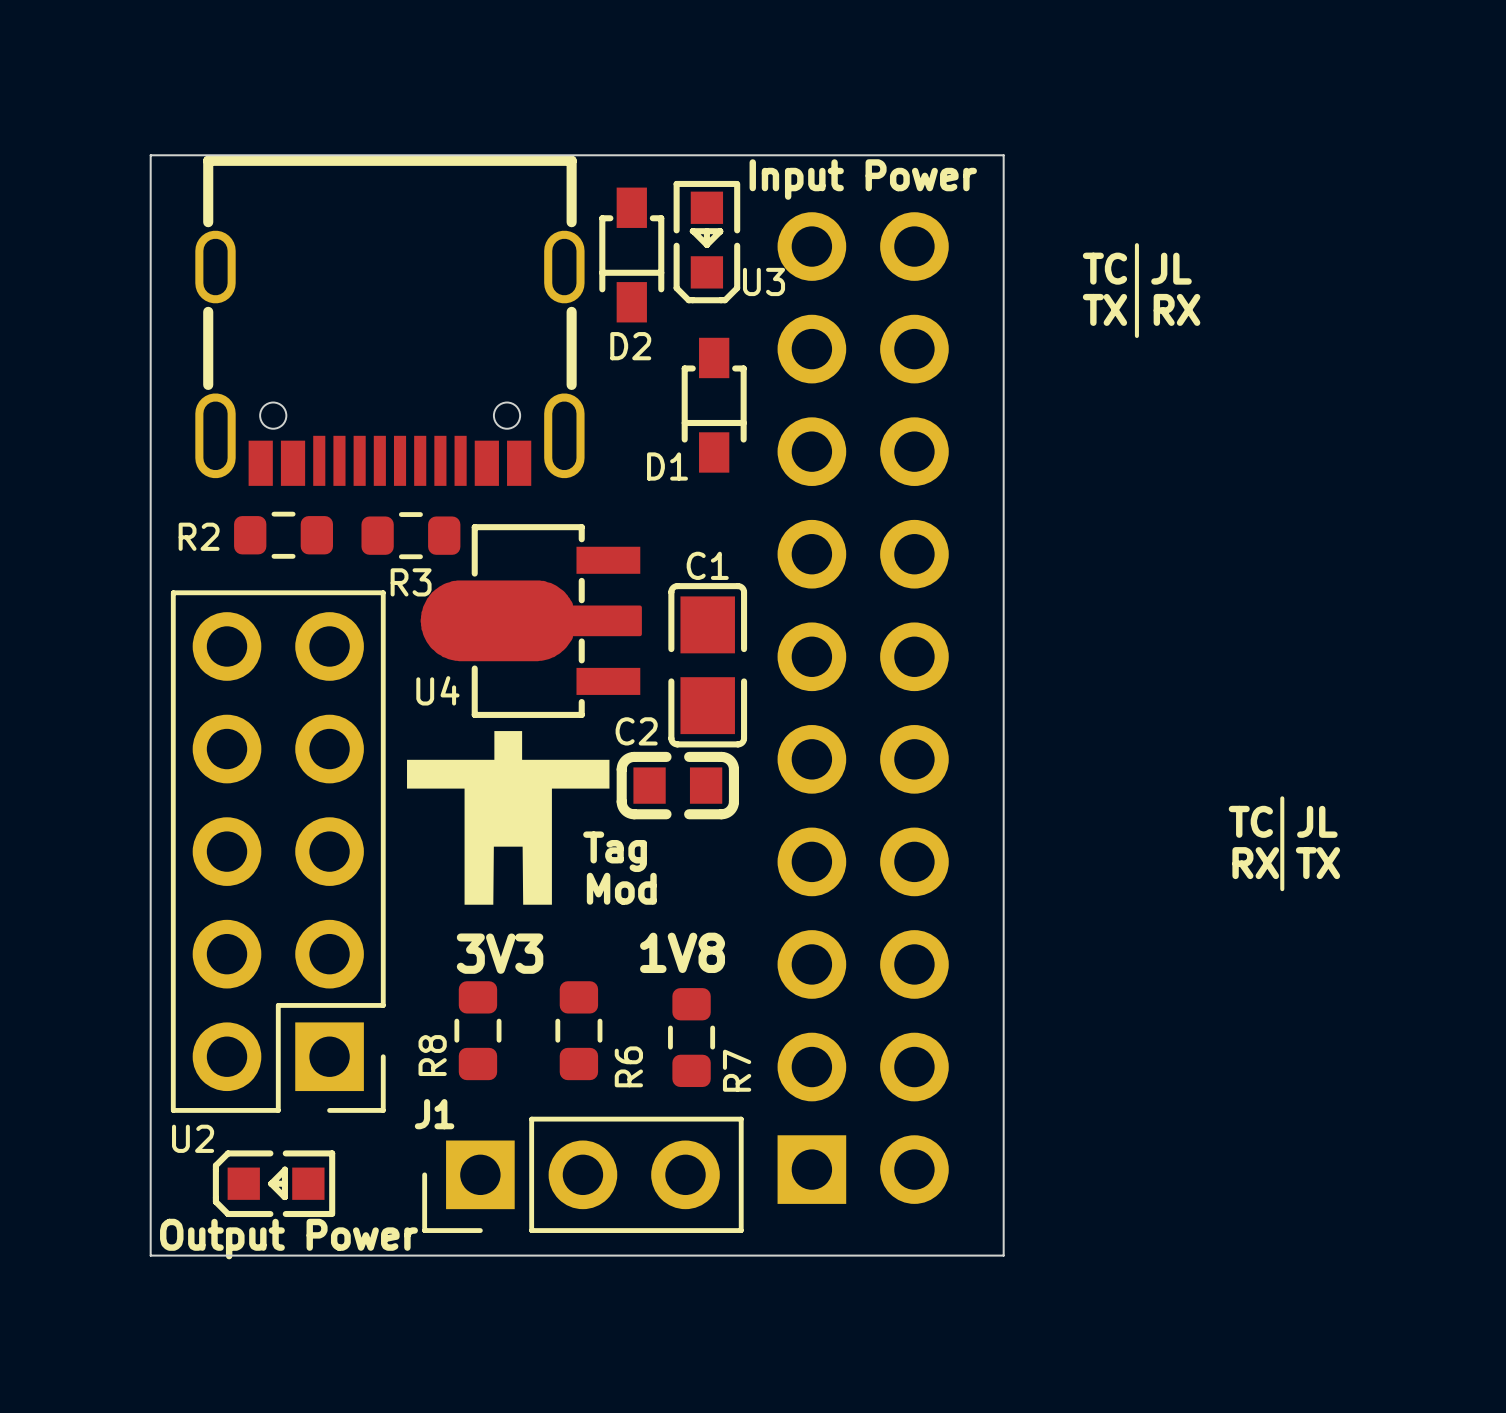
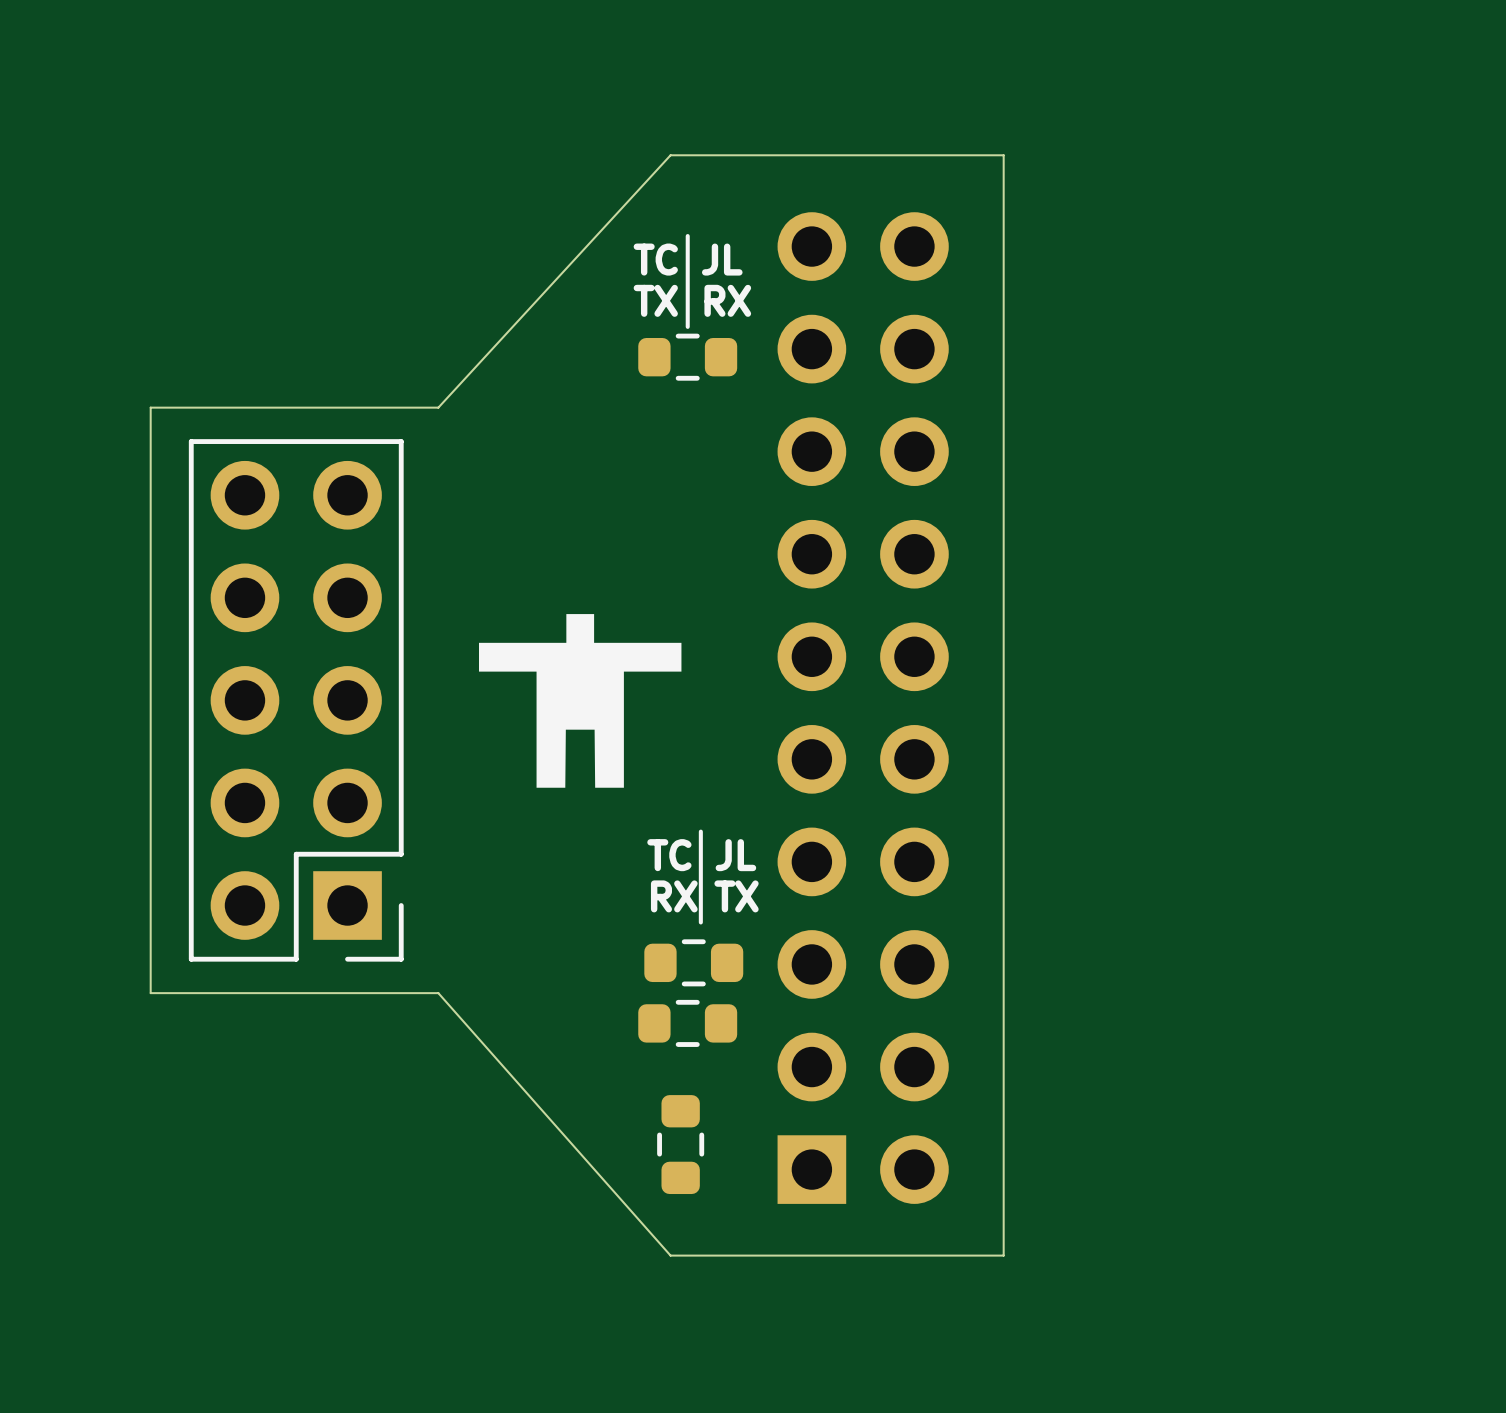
board edge: (670, 155) (150, 155) (150, 407) -> (670, 155) (438, 407) (150, 407)
text: Input Power (863, 179) -> none
U3: (706, 242) -> none
line: (1136, 245) (1136, 335) -> (687, 236) (687, 326)
D2: (631, 255) -> none
text: none -> TC (655, 259)
text: none -> JL (722, 259)
text: TC (1104, 268) -> none
text: JL (1171, 268) -> none
text: none -> TX (655, 300)
text: none -> RX (727, 300)
text: TX (1104, 309) -> none
text: RX (1176, 309) -> none
U4: (389, 320) -> none
part: none -> (687, 357)
D1: (714, 405) -> none
R2: (283, 535) -> none
R3: (410, 535) -> none
part: (531, 621) -> none
C1: (707, 665) -> none
C2: (677, 785) -> none
line: (1282, 798) (1282, 889) -> (700, 831) (700, 922)
drawing position: (508, 817) -> (580, 700)
text: TC (1250, 821) -> none
text: JL (1317, 821) -> none
part position: (278, 851) -> (296, 700)
text: Tag (615, 851) -> none
text: none -> TC (669, 855)
text: none -> JL (735, 855)
text: RX (1255, 863) -> none
text: TX (1317, 863) -> none
text: Mod (621, 888) -> none
text: none -> RX (674, 896)
text: none -> TX (736, 896)
text: 1V8 (682, 952) -> none
text: 3V3 (500, 953) -> none
part: none -> (693, 962)
board edge: (150, 993) (150, 1255) (670, 1255) -> (150, 993) (438, 993) (670, 1255)
part: none -> (687, 1023)
R8: (477, 1030) -> none
R6: (578, 1030) -> none
R7: (691, 1037) -> none
part: none -> (680, 1144)
J1: (582, 1174) -> none
U2: (274, 1183) -> none
text: Output Power (288, 1239) -> none

